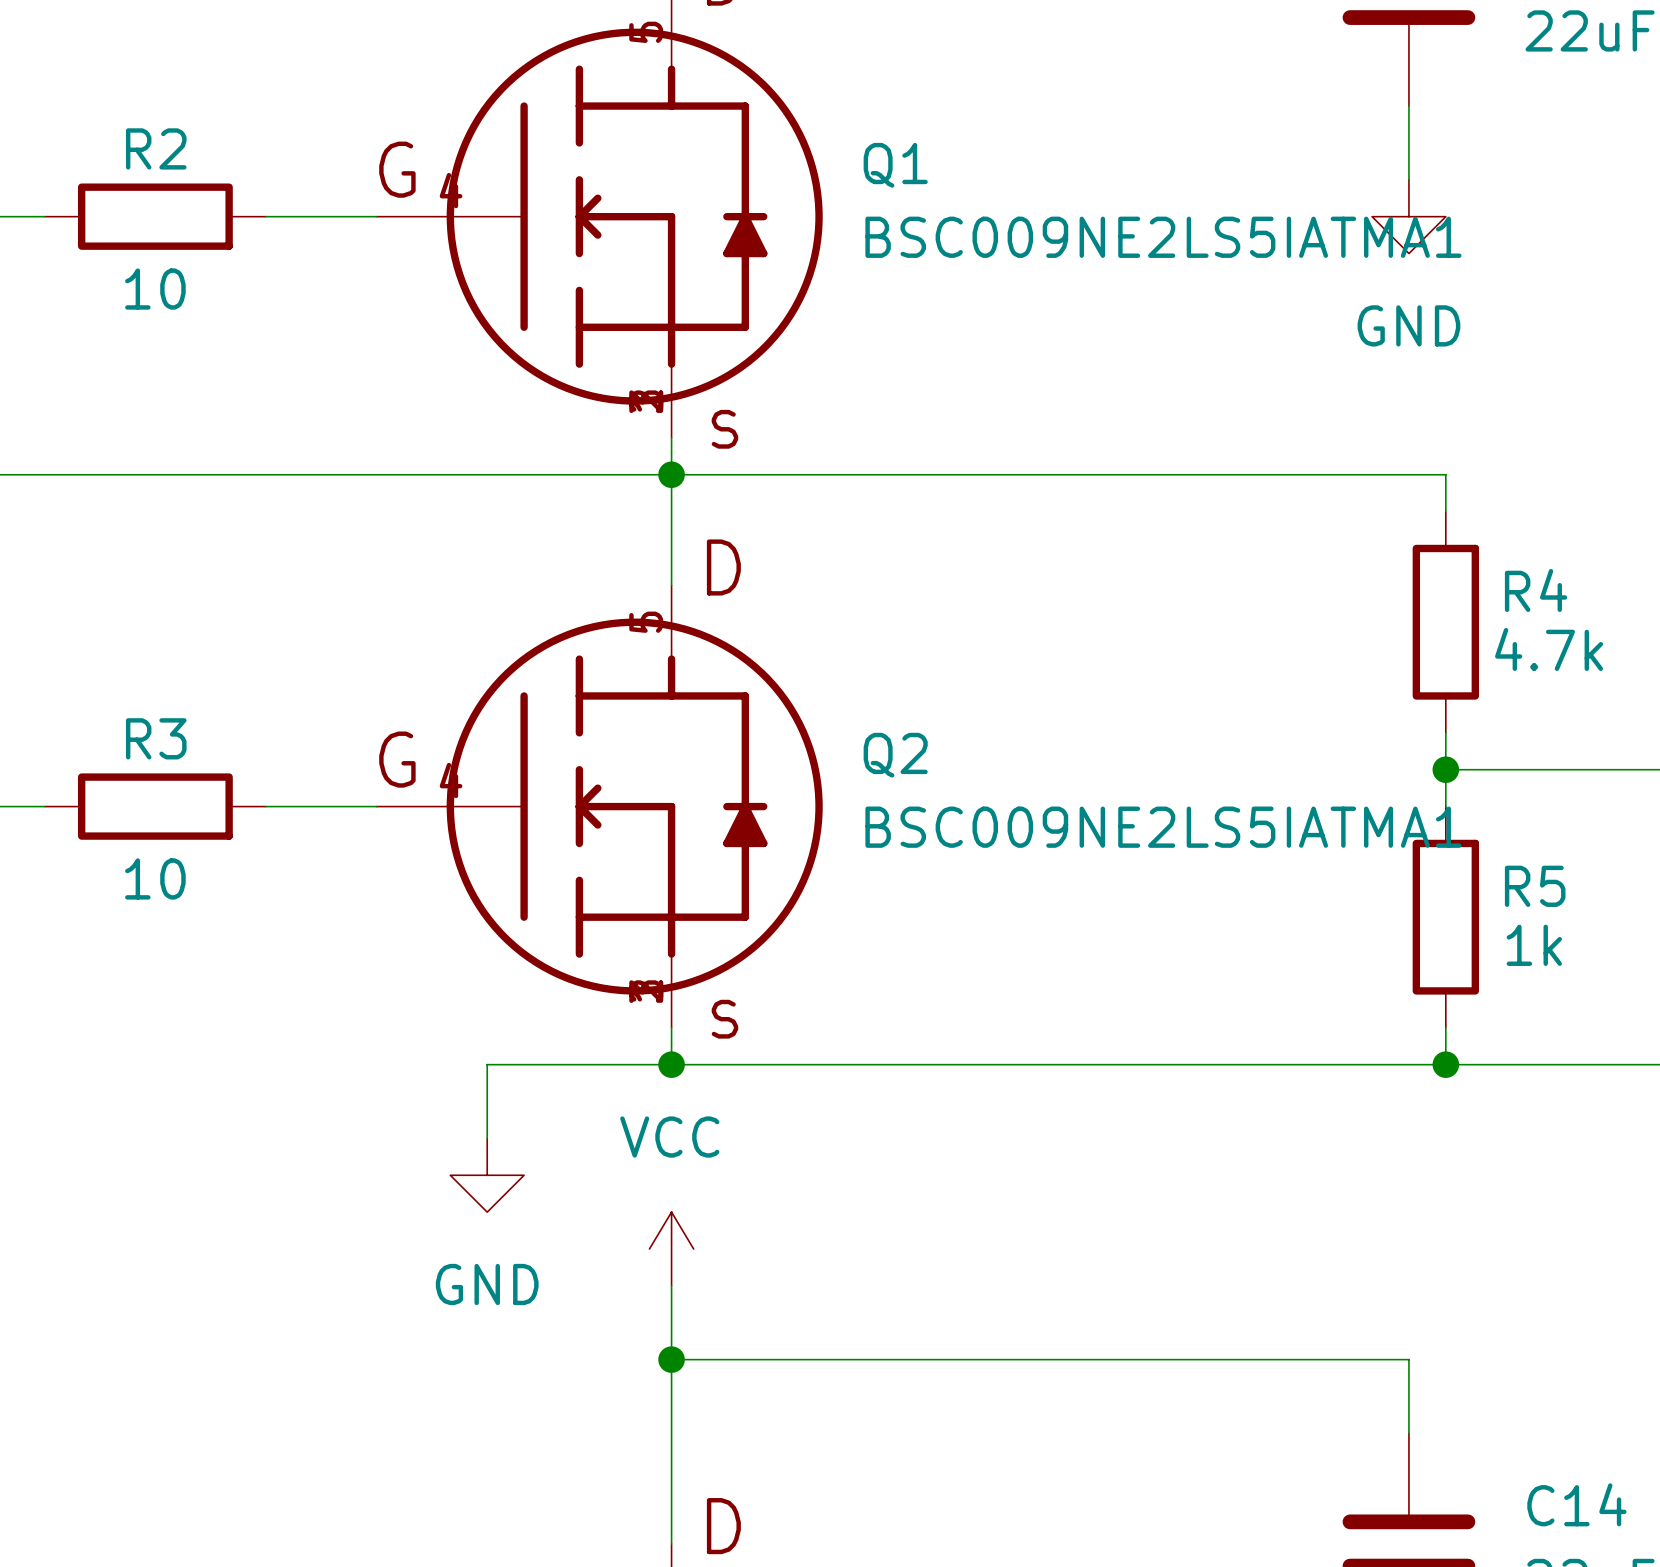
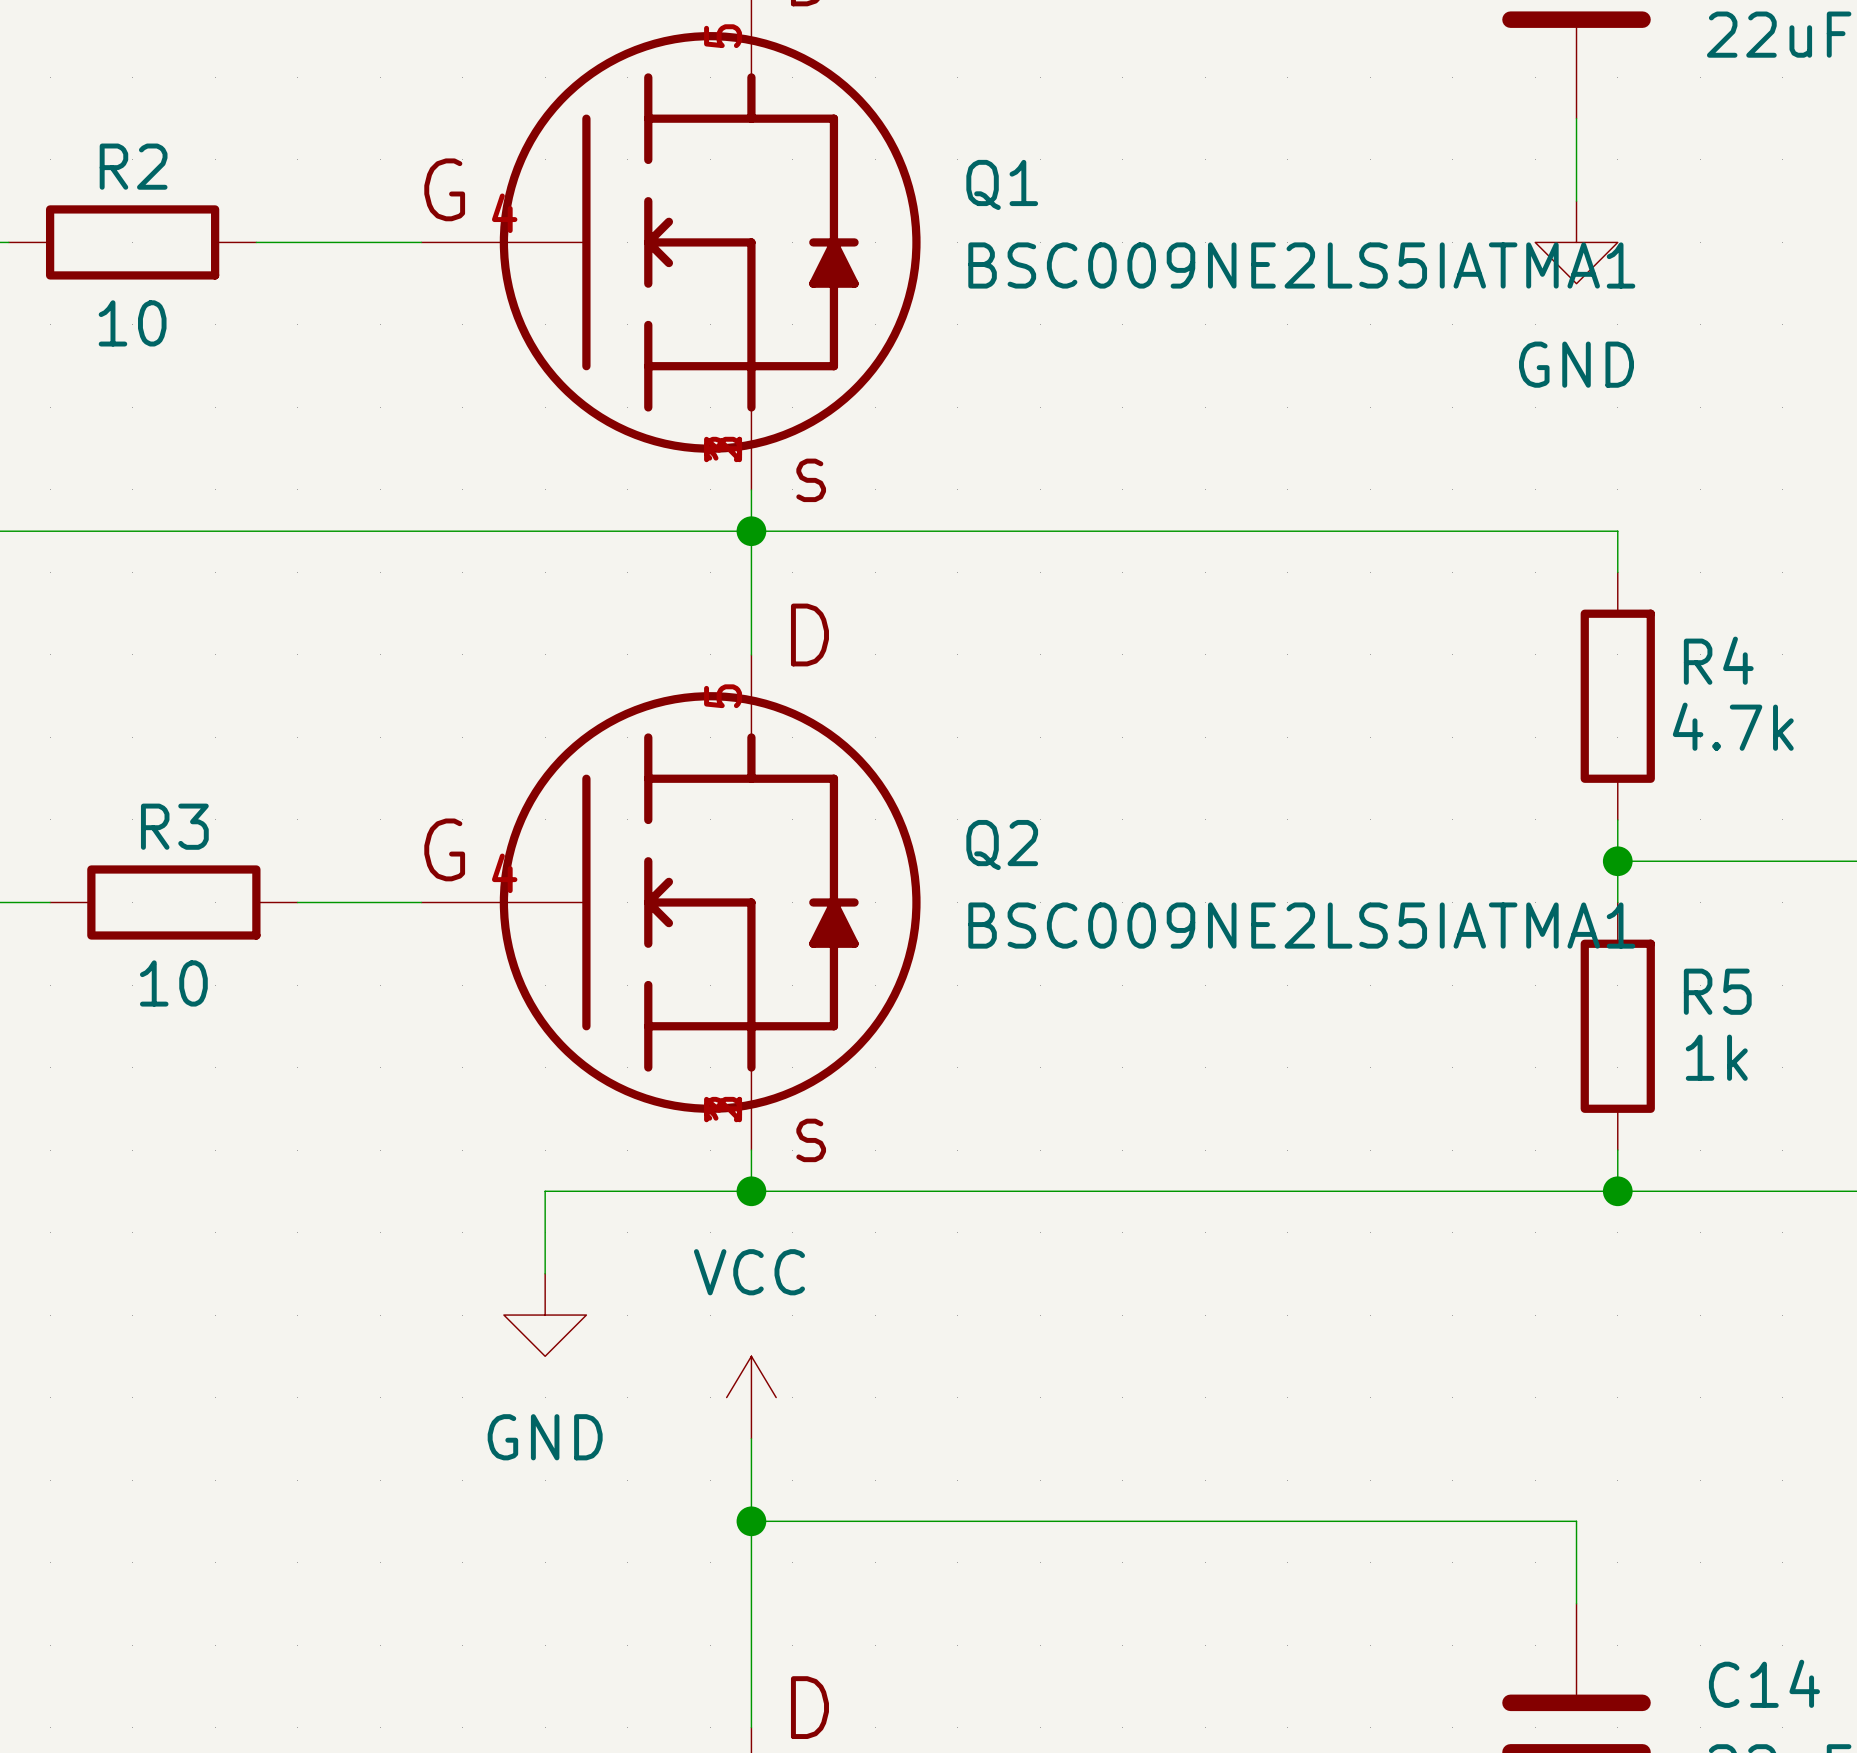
R2 position: (155, 216) -> (132, 242)

